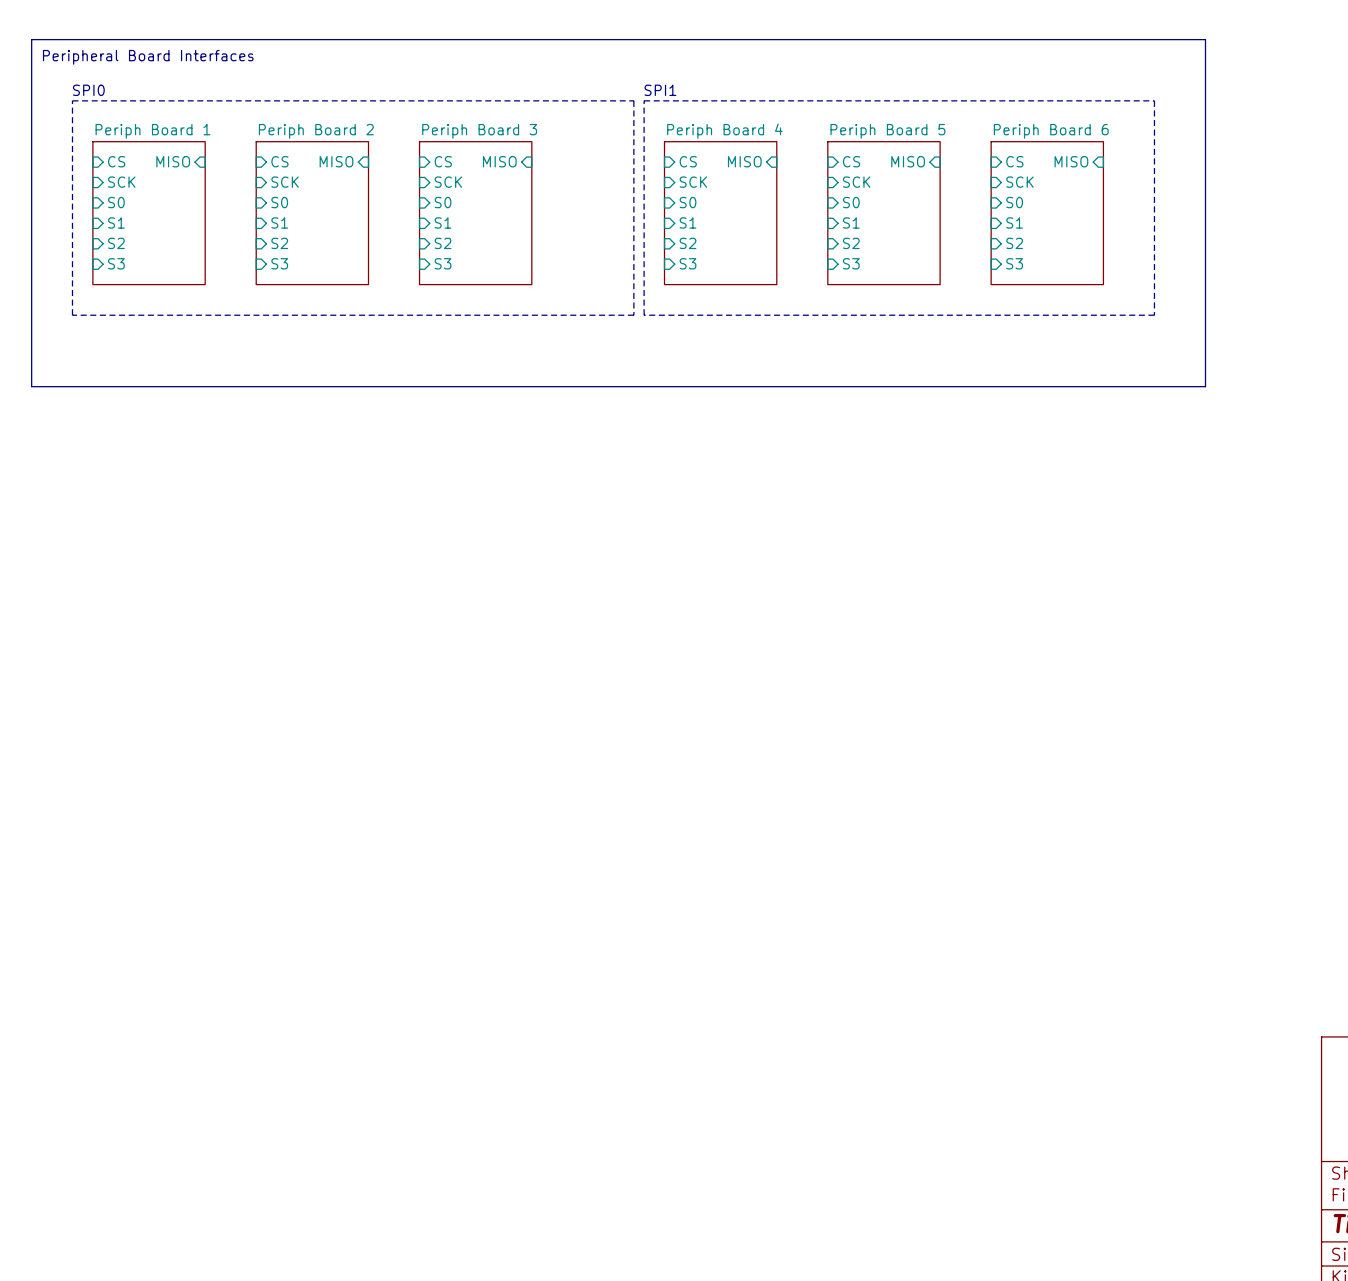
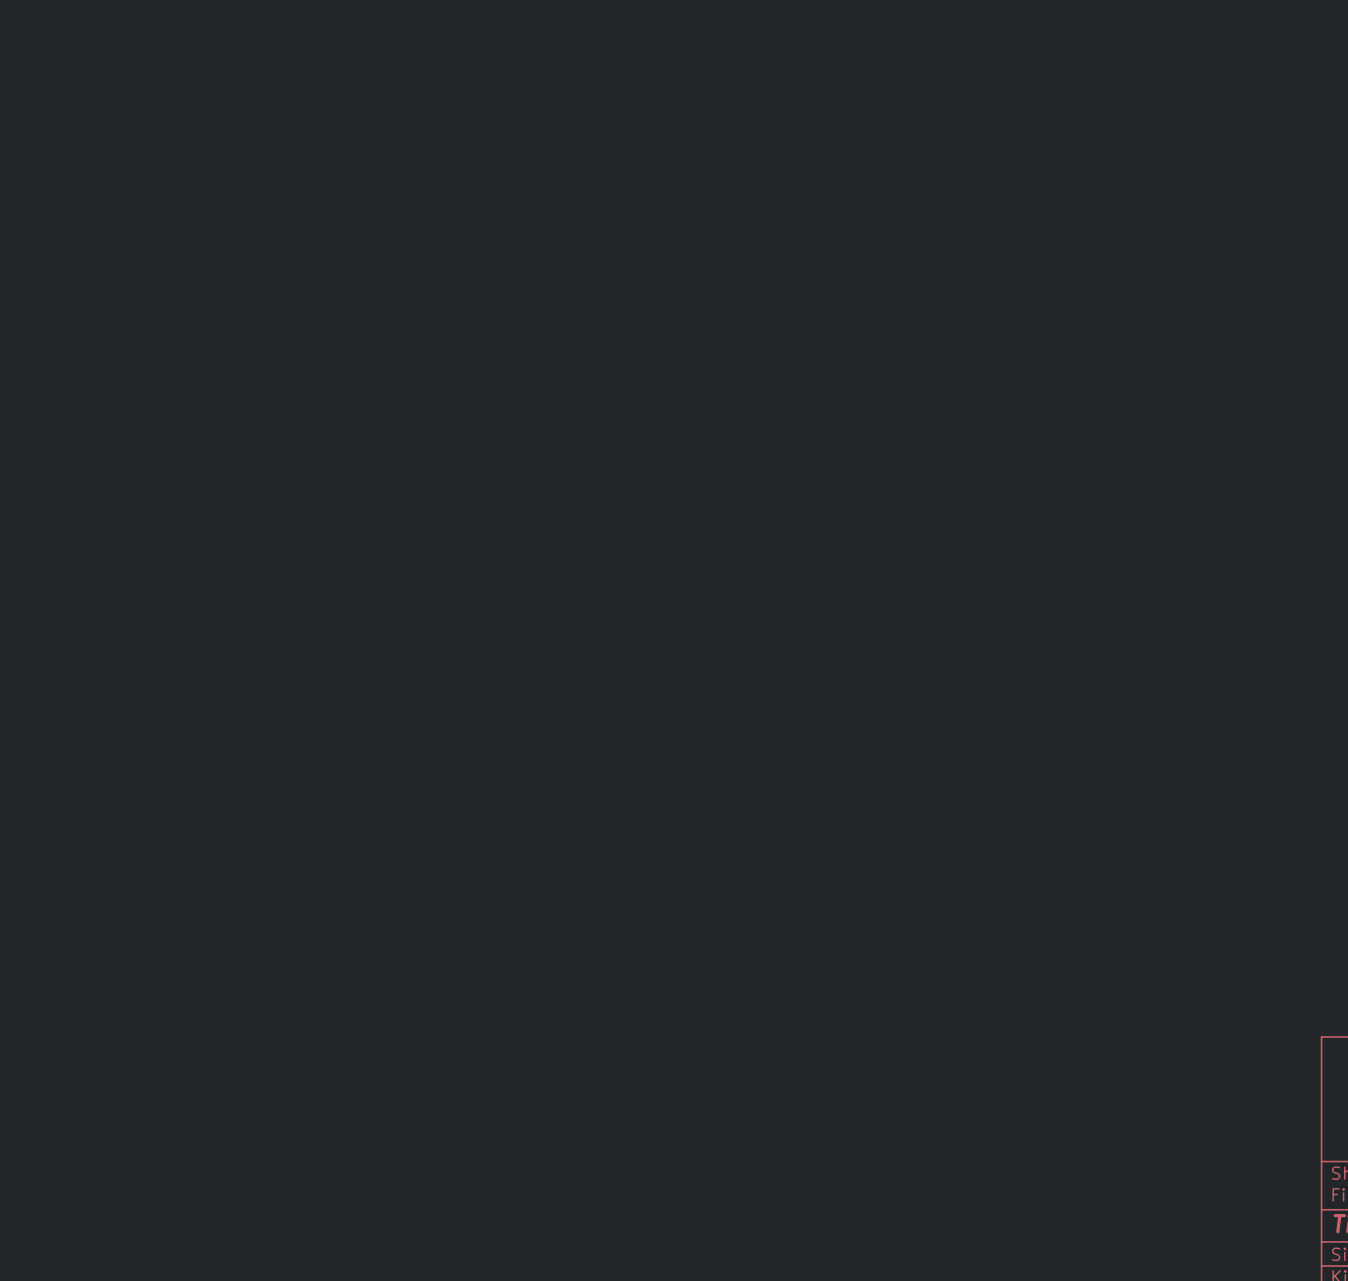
line: (31, 39) (1205, 39) (1205, 386) (31, 386) (31, 39) -> none
text: Peripheral Board Interfaces (148, 57) -> none
text: SPI0 (88, 90) -> none
text: SPI1 (660, 90) -> none
line: (72, 100) (633, 100) (633, 315) (72, 315) (72, 100) -> none
line: (644, 100) (1154, 100) (1154, 315) (644, 315) (644, 100) -> none
sheet pin: CS (116, 161) -> none
sheet pin: MISO (173, 161) -> none
sheet pin: CS (279, 161) -> none
sheet pin: MISO (336, 161) -> none
sheet pin: CS (443, 161) -> none
sheet pin: MISO (499, 161) -> none
sheet pin: CS (688, 161) -> none
sheet pin: MISO (744, 161) -> none
sheet pin: CS (851, 161) -> none
sheet pin: MISO (908, 161) -> none
sheet pin: CS (1014, 161) -> none
sheet pin: MISO (1071, 161) -> none
sheet pin: SCK (121, 182) -> none
sheet pin: SCK (285, 182) -> none
sheet pin: SCK (448, 182) -> none
sheet pin: SCK (693, 182) -> none
sheet pin: SCK (856, 182) -> none
sheet pin: SCK (1019, 182) -> none
sheet pin: S0 (116, 202) -> none
sheet pin: S0 (279, 202) -> none
sheet pin: S0 (443, 202) -> none
sheet pin: S0 (688, 202) -> none
sheet pin: S0 (851, 202) -> none
sheet pin: S0 (1014, 202) -> none
sheet Periph Board 1: (149, 213) -> none
sheet Periph Board 2: (312, 213) -> none
sheet Periph Board 3: (475, 213) -> none
sheet Periph Board 4: (720, 213) -> none
sheet Periph Board 5: (883, 213) -> none
sheet Periph Board 6: (1047, 213) -> none
sheet pin: S1 (116, 222) -> none
sheet pin: S1 (279, 222) -> none
sheet pin: S1 (443, 222) -> none
sheet pin: S1 (688, 222) -> none
sheet pin: S1 (851, 222) -> none
sheet pin: S1 (1014, 222) -> none
sheet pin: S2 (116, 243) -> none
sheet pin: S2 (279, 243) -> none
sheet pin: S2 (443, 243) -> none
sheet pin: S2 (688, 243) -> none
sheet pin: S2 (851, 243) -> none
sheet pin: S2 (1014, 243) -> none
sheet pin: S3 (116, 263) -> none
sheet pin: S3 (279, 263) -> none
sheet pin: S3 (443, 263) -> none
sheet pin: S3 (688, 263) -> none
sheet pin: S3 (851, 263) -> none
sheet pin: S3 (1014, 263) -> none

